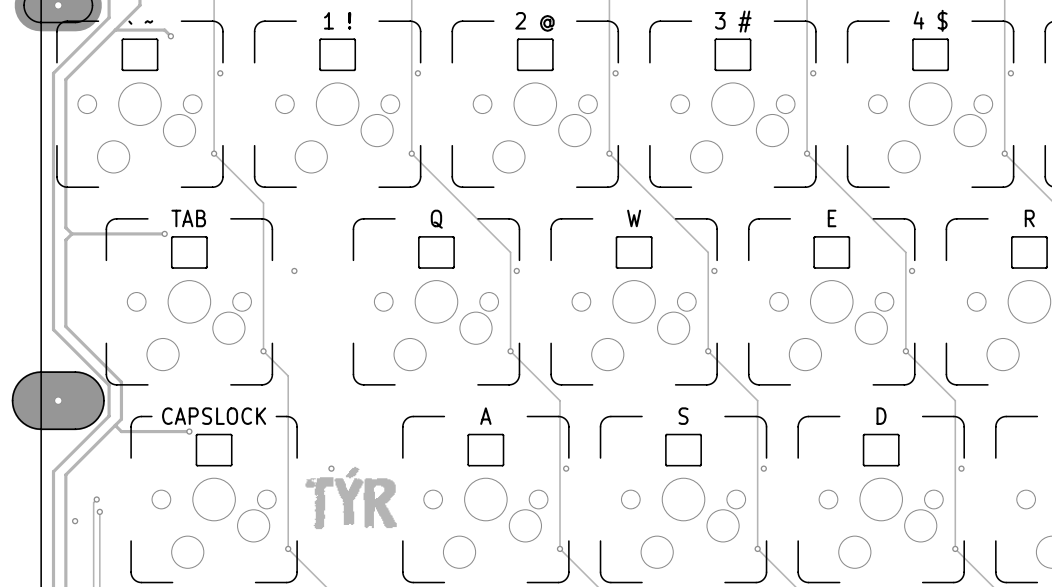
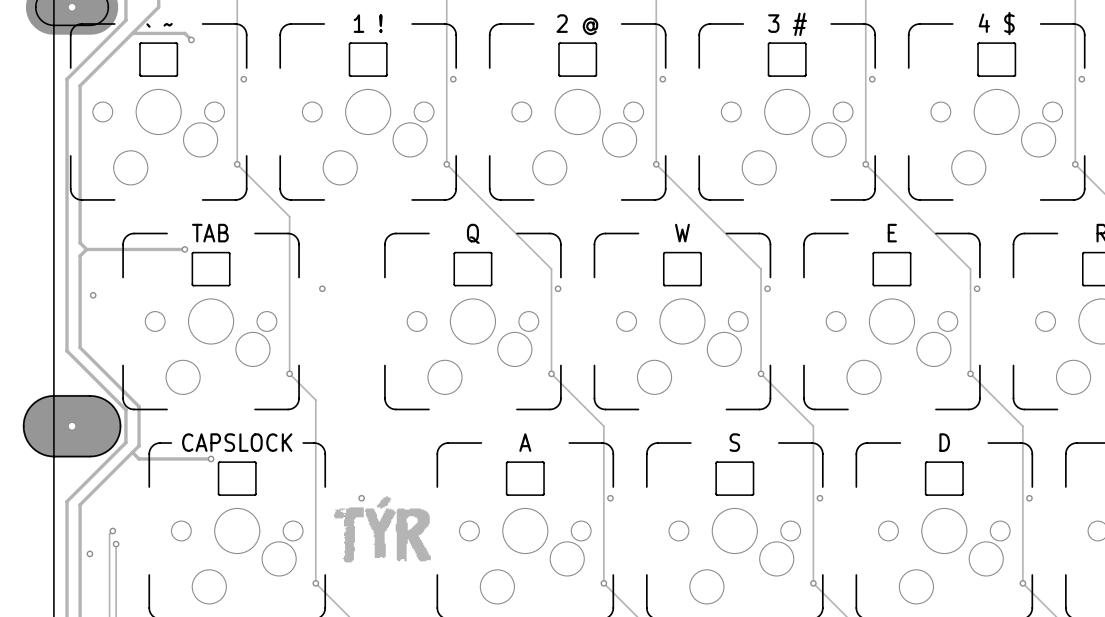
via: none -> (93, 295)

